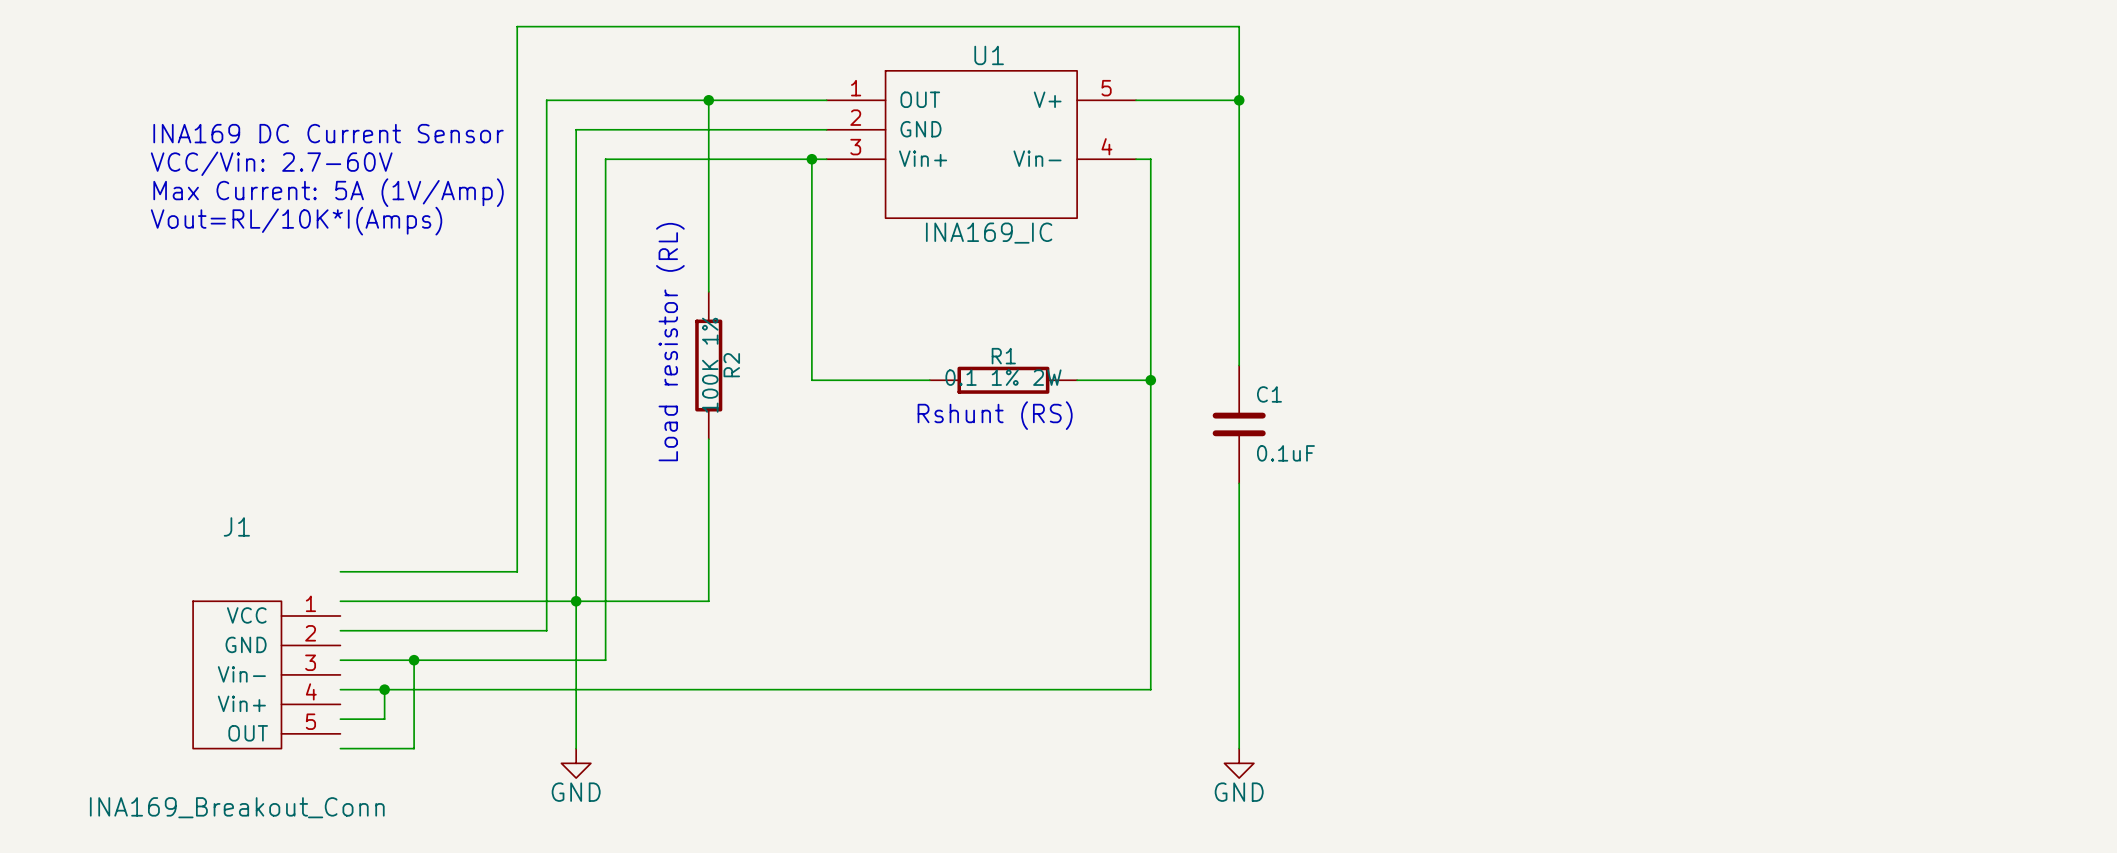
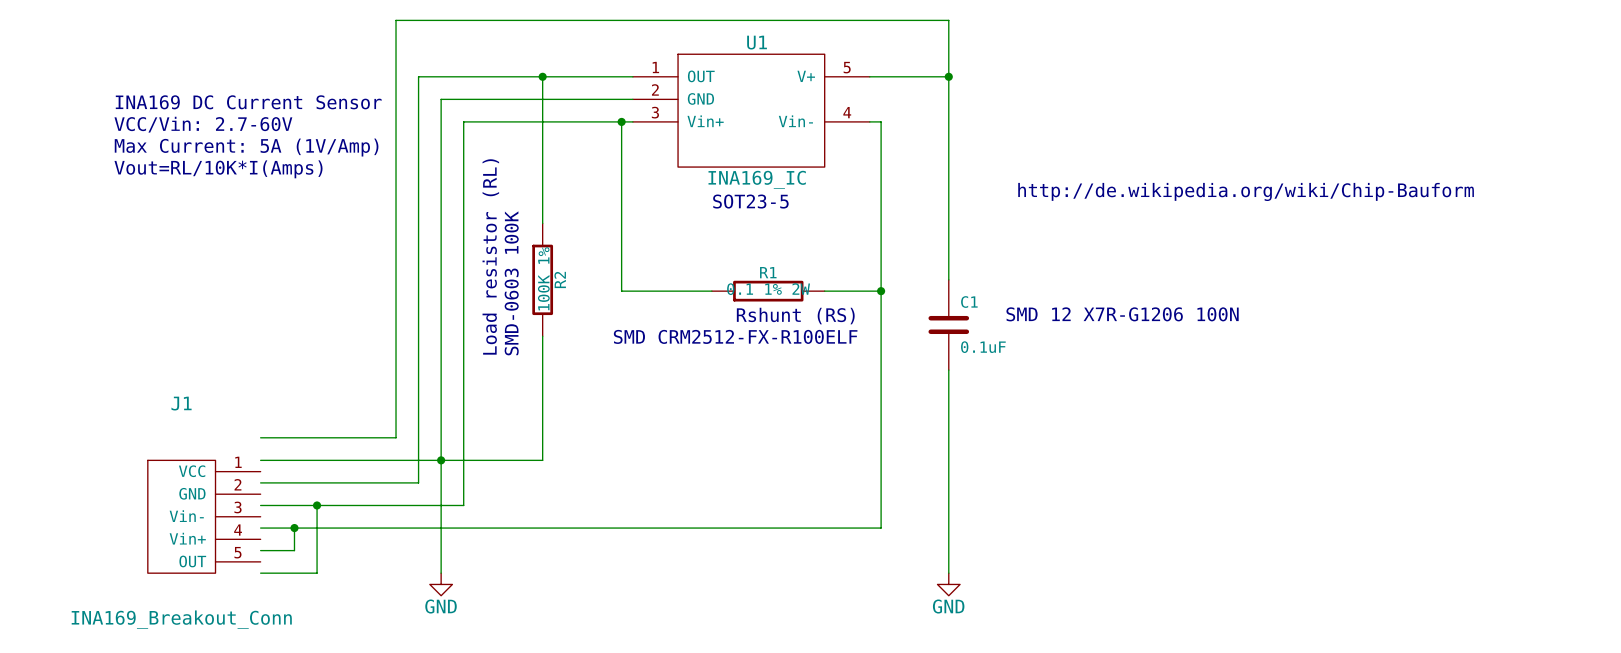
text: none -> http://de.wikipedia.org/wiki/Chip-Bauform (1246, 191)
text: none -> SOT23-5 (750, 201)
text: none -> Load resistor (RL) (490, 256)
text: Load resistor (RL) (670, 342) -> SMD-0603 100K (511, 283)
text: none -> SMD 12 X7R-G1206 100N (1122, 314)
text position: Rshunt (RS) (995, 415) -> Rshunt (RS) (795, 316)
text: none -> SMD CRM2512-FX-R100ELF (735, 336)

